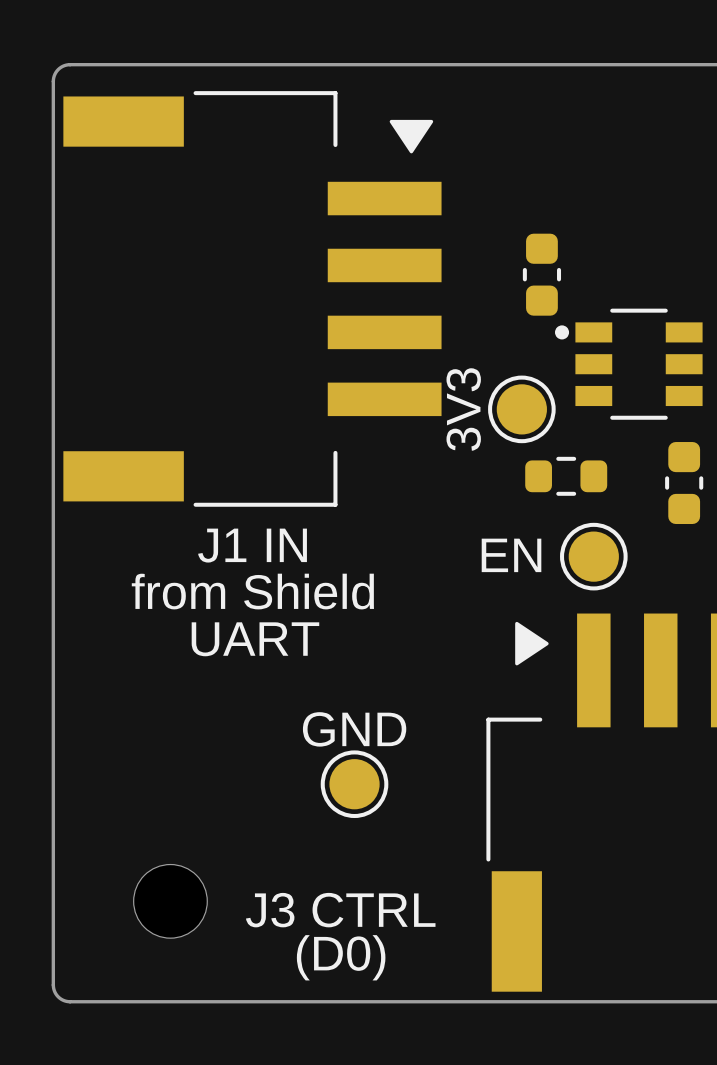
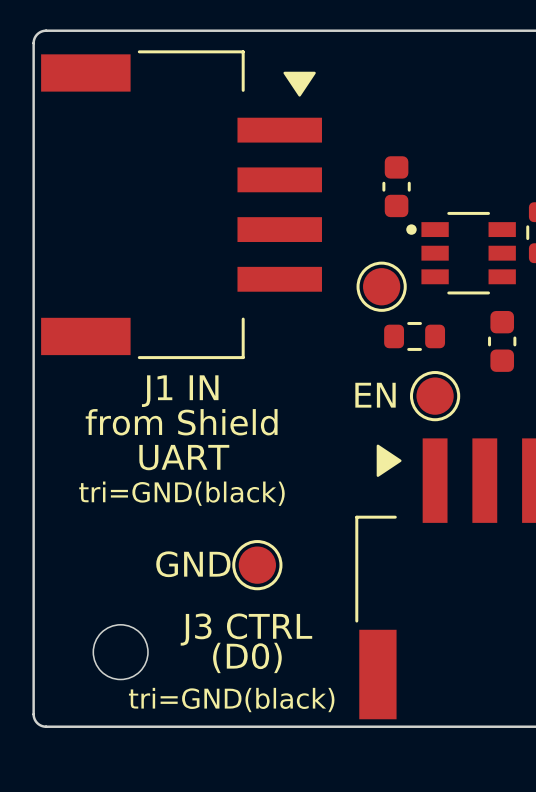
text: 3V3 (463, 409) -> none
text: none -> tri=GND(black) (181, 493)
text position: GND (354, 729) -> GND (193, 564)
text: none -> J3 CTRL (246, 629)
text: J3 CTRL (340, 910) -> (D0) (247, 657)
text: (D0) (341, 957) -> tri=GND(black) (231, 700)

